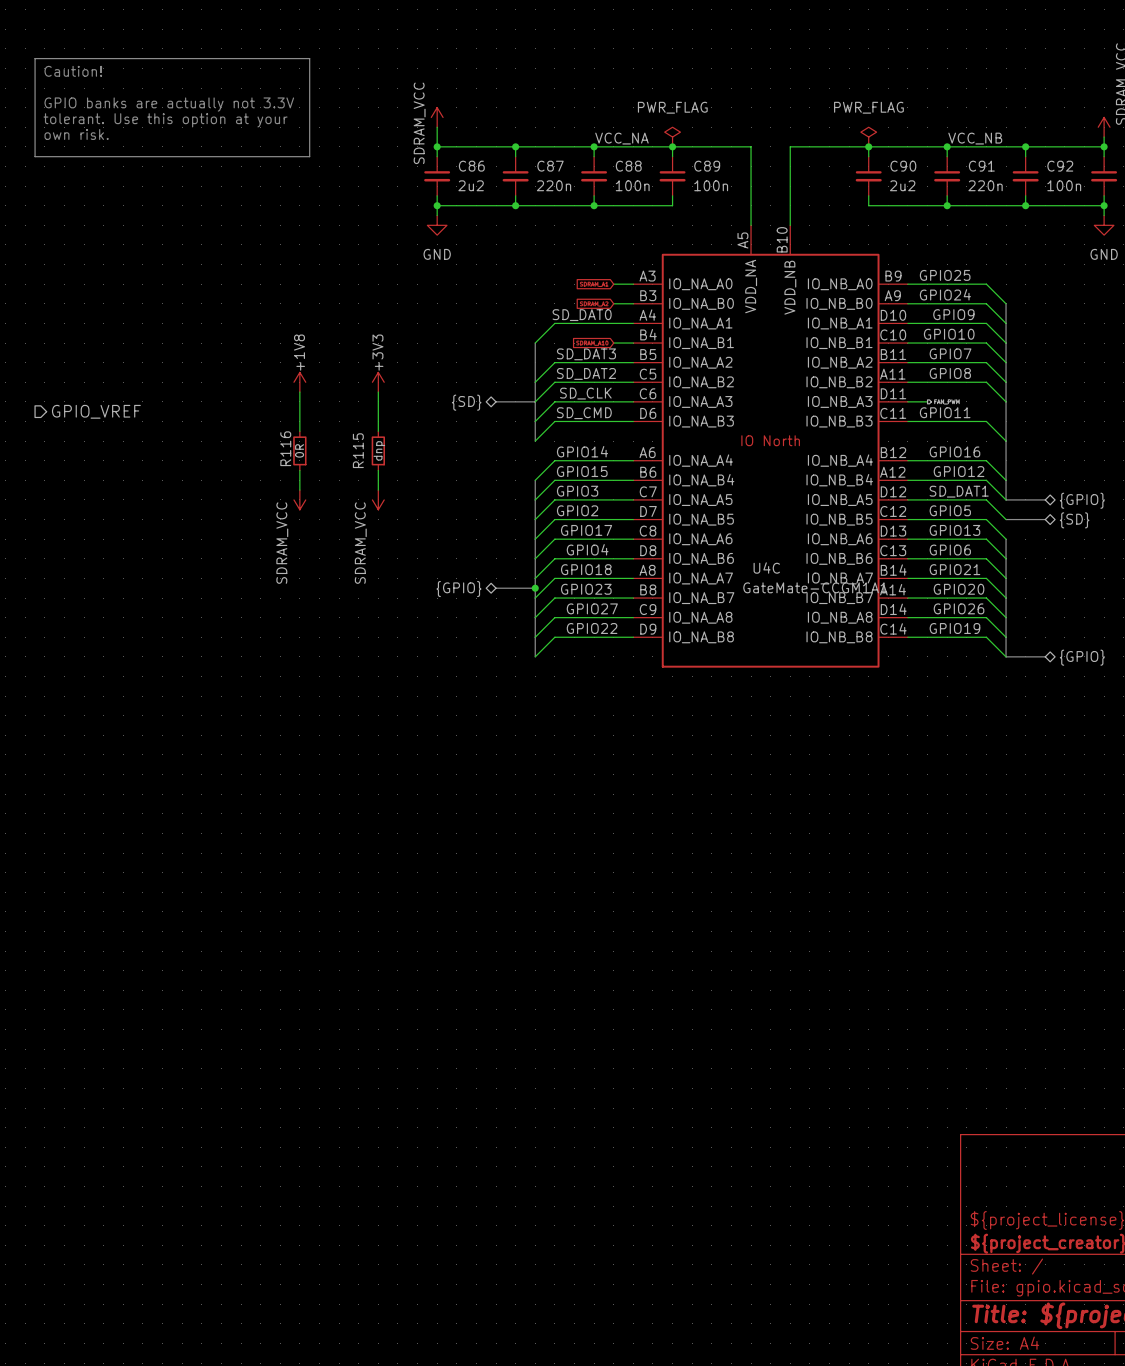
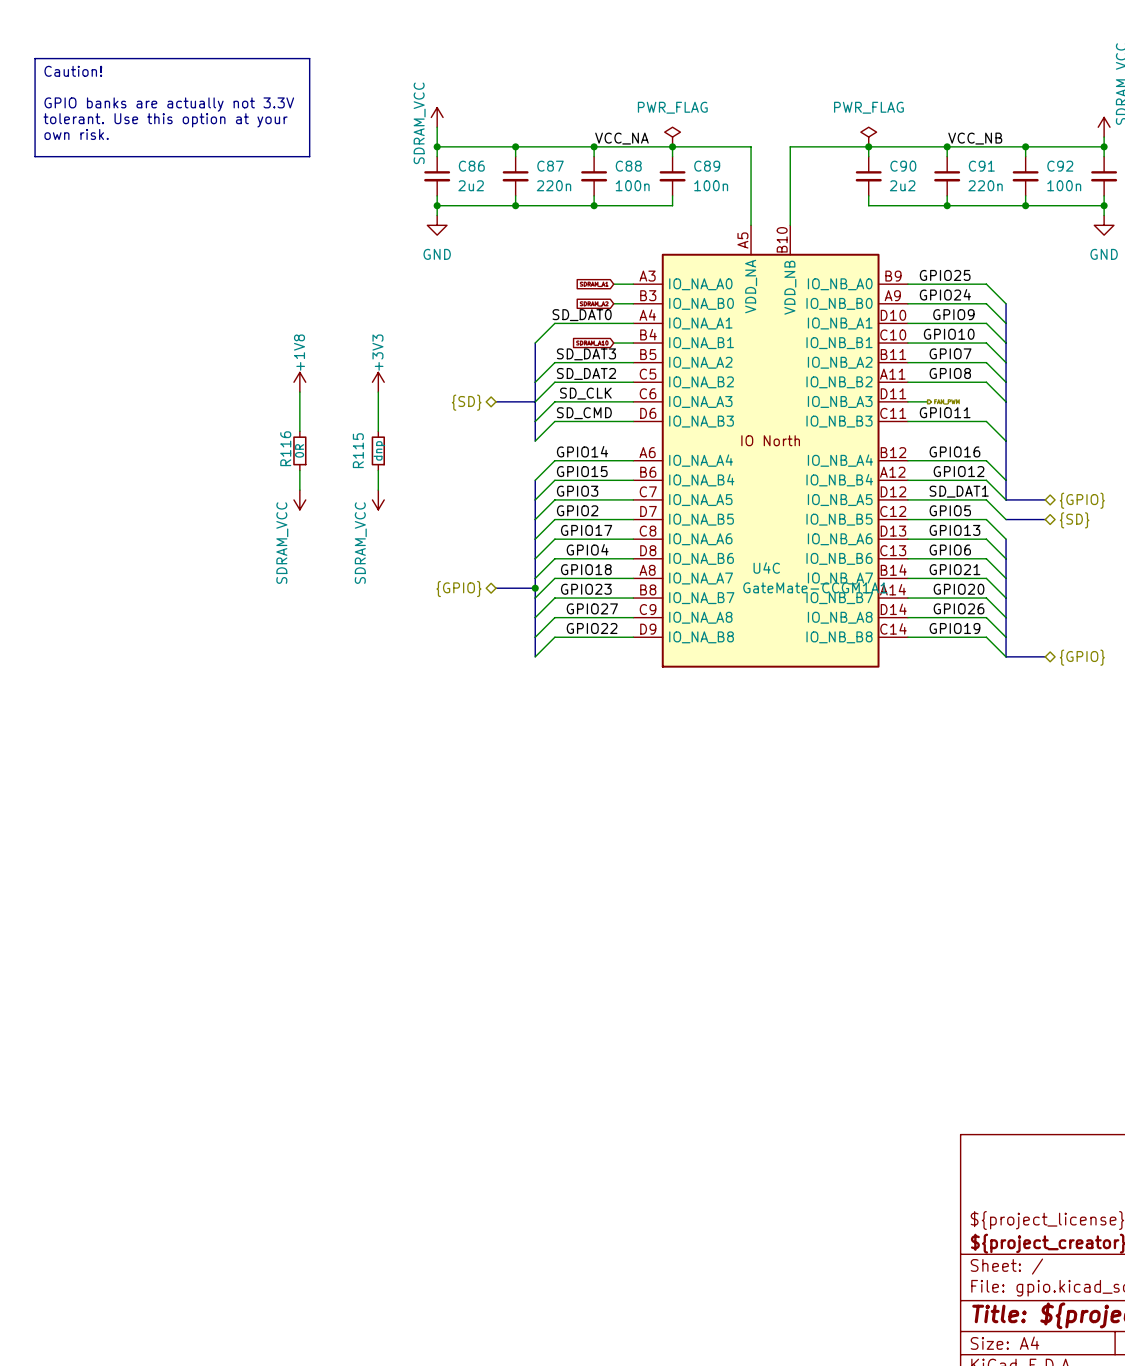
hierarchical label: GPIO_VREF (96, 411) -> none

